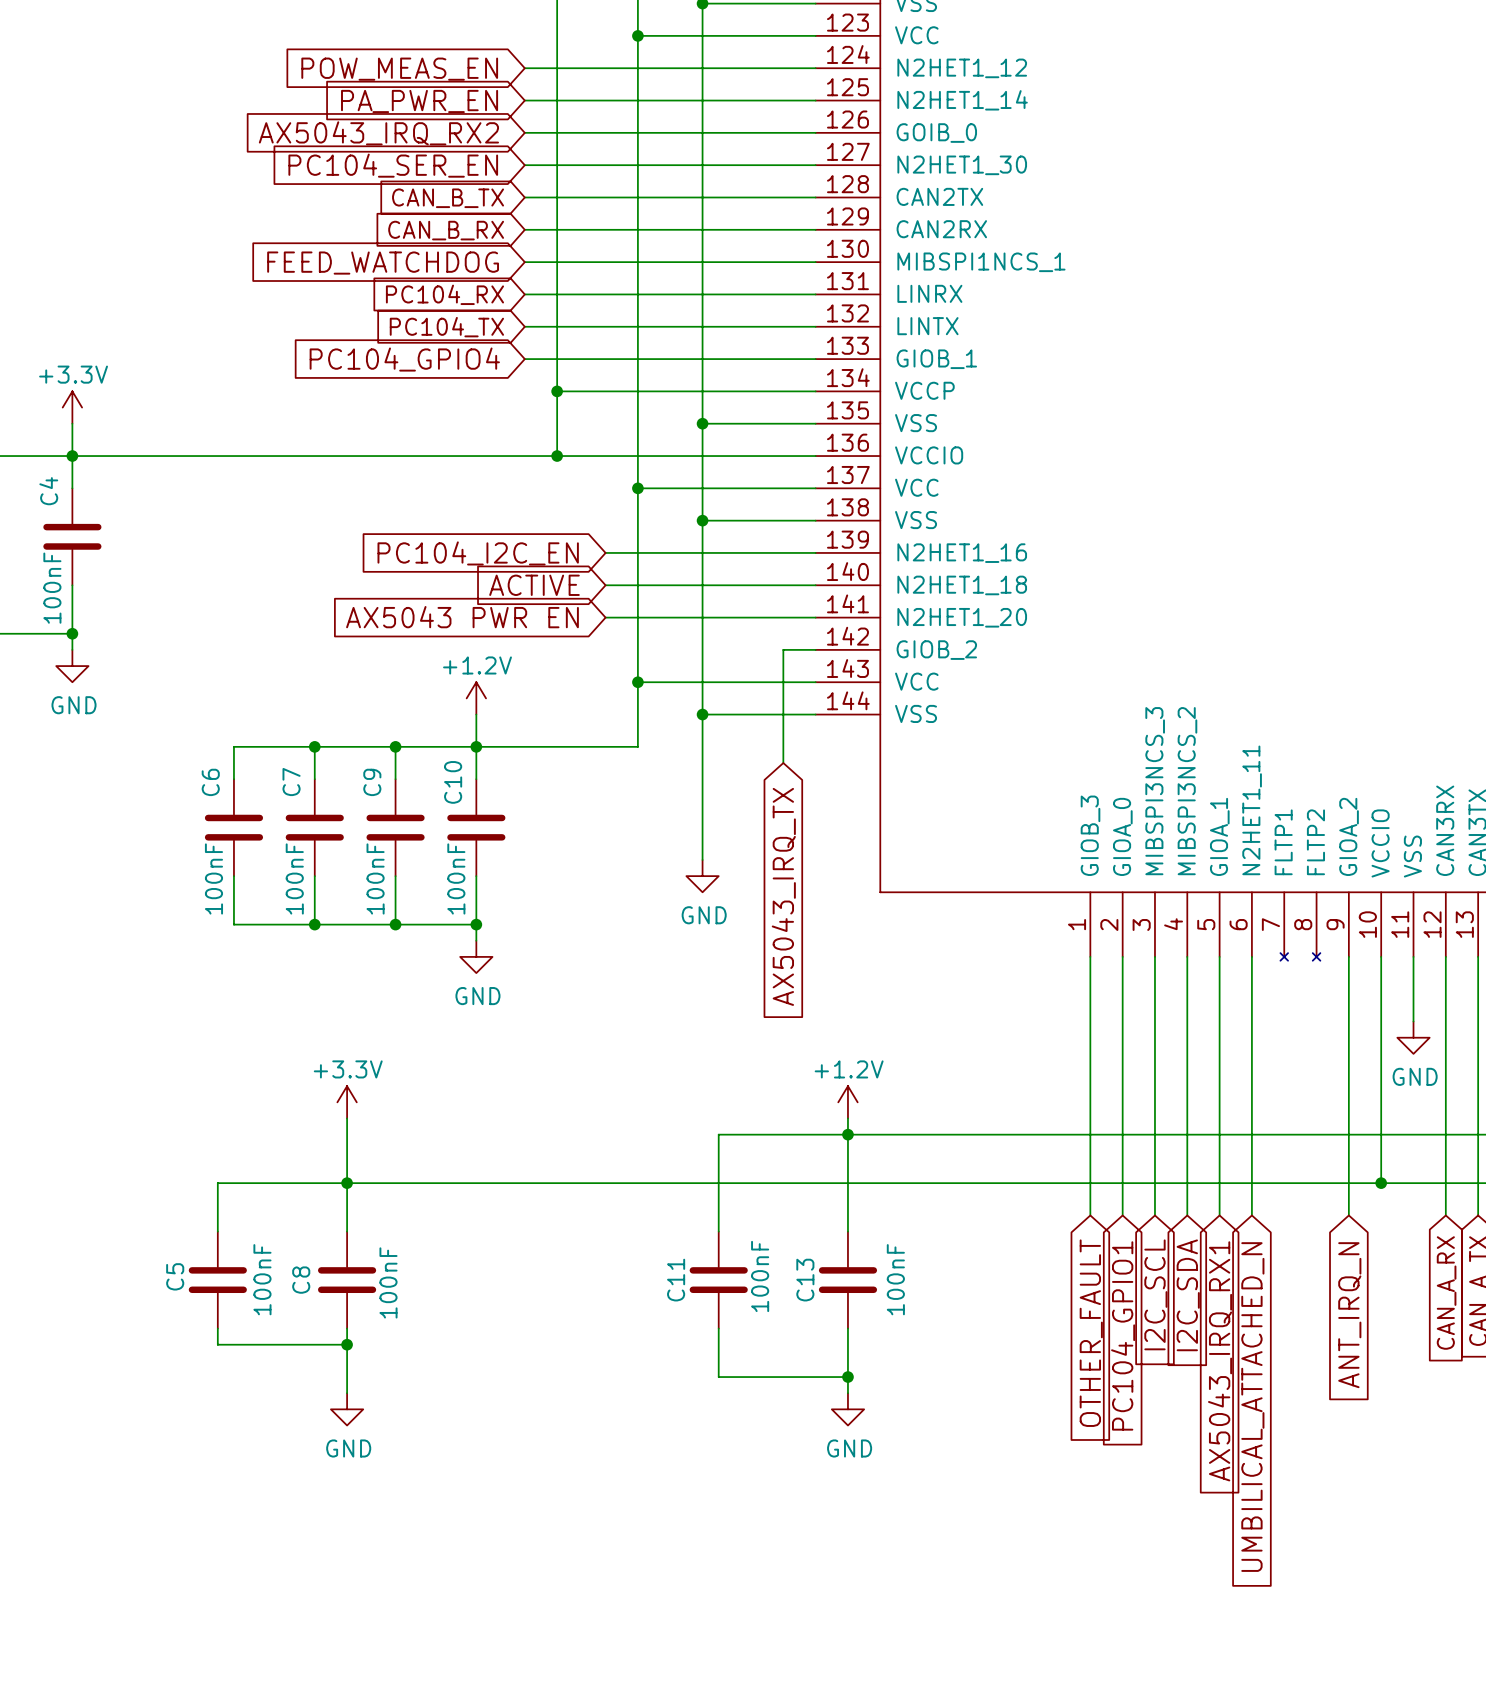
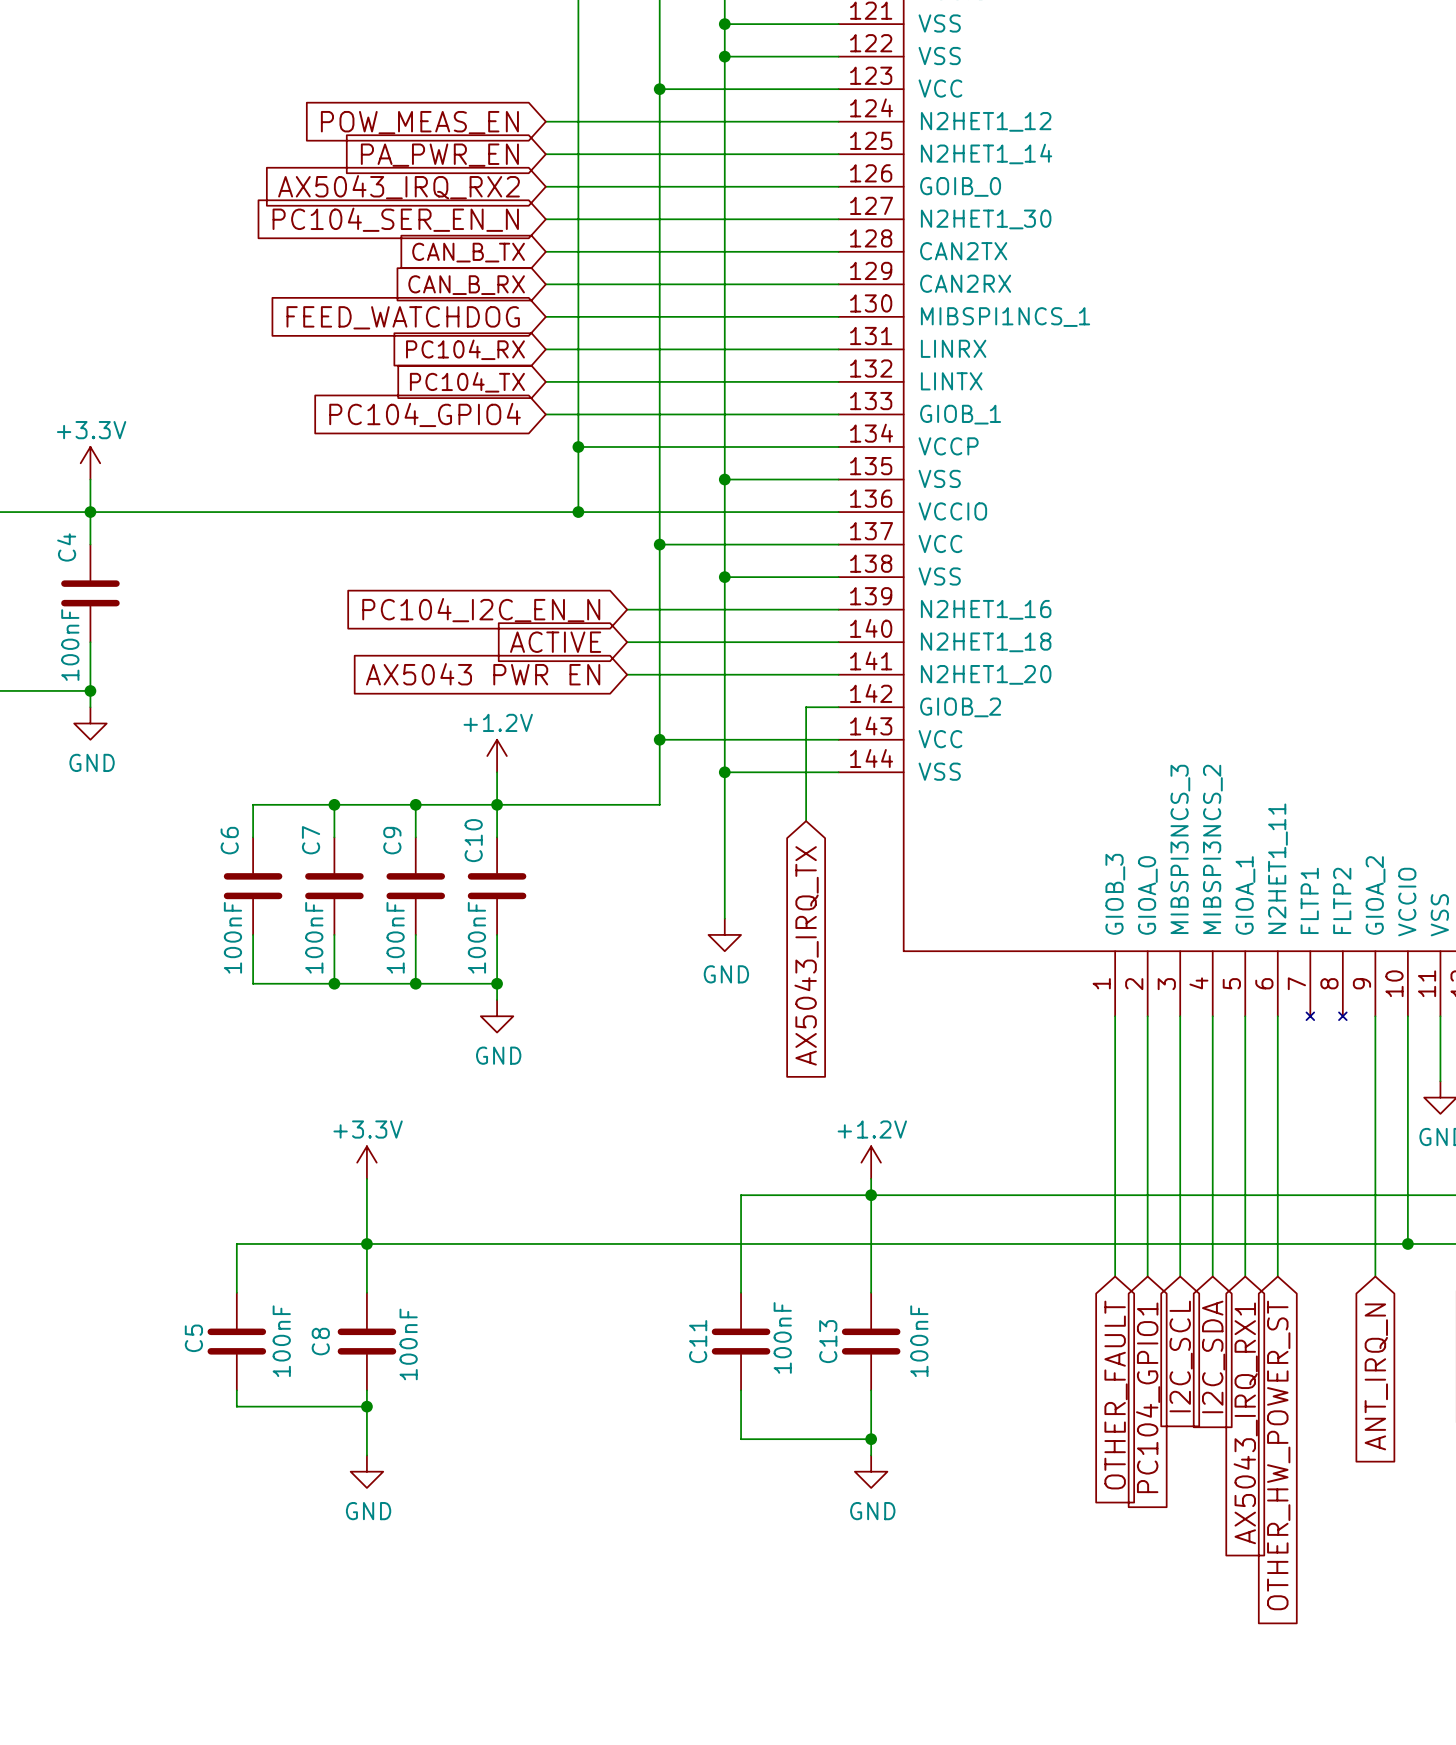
global label: PC104_SER_EN (393, 165) -> PC104_SER_EN_N (395, 219)
global label: PC104_I2C_EN (478, 553) -> PC104_I2C_EN_N (481, 610)
global label: UMBILICAL_ATTACHED_N (1252, 1407) -> OTHER_HW_POWER_ST (1278, 1455)

